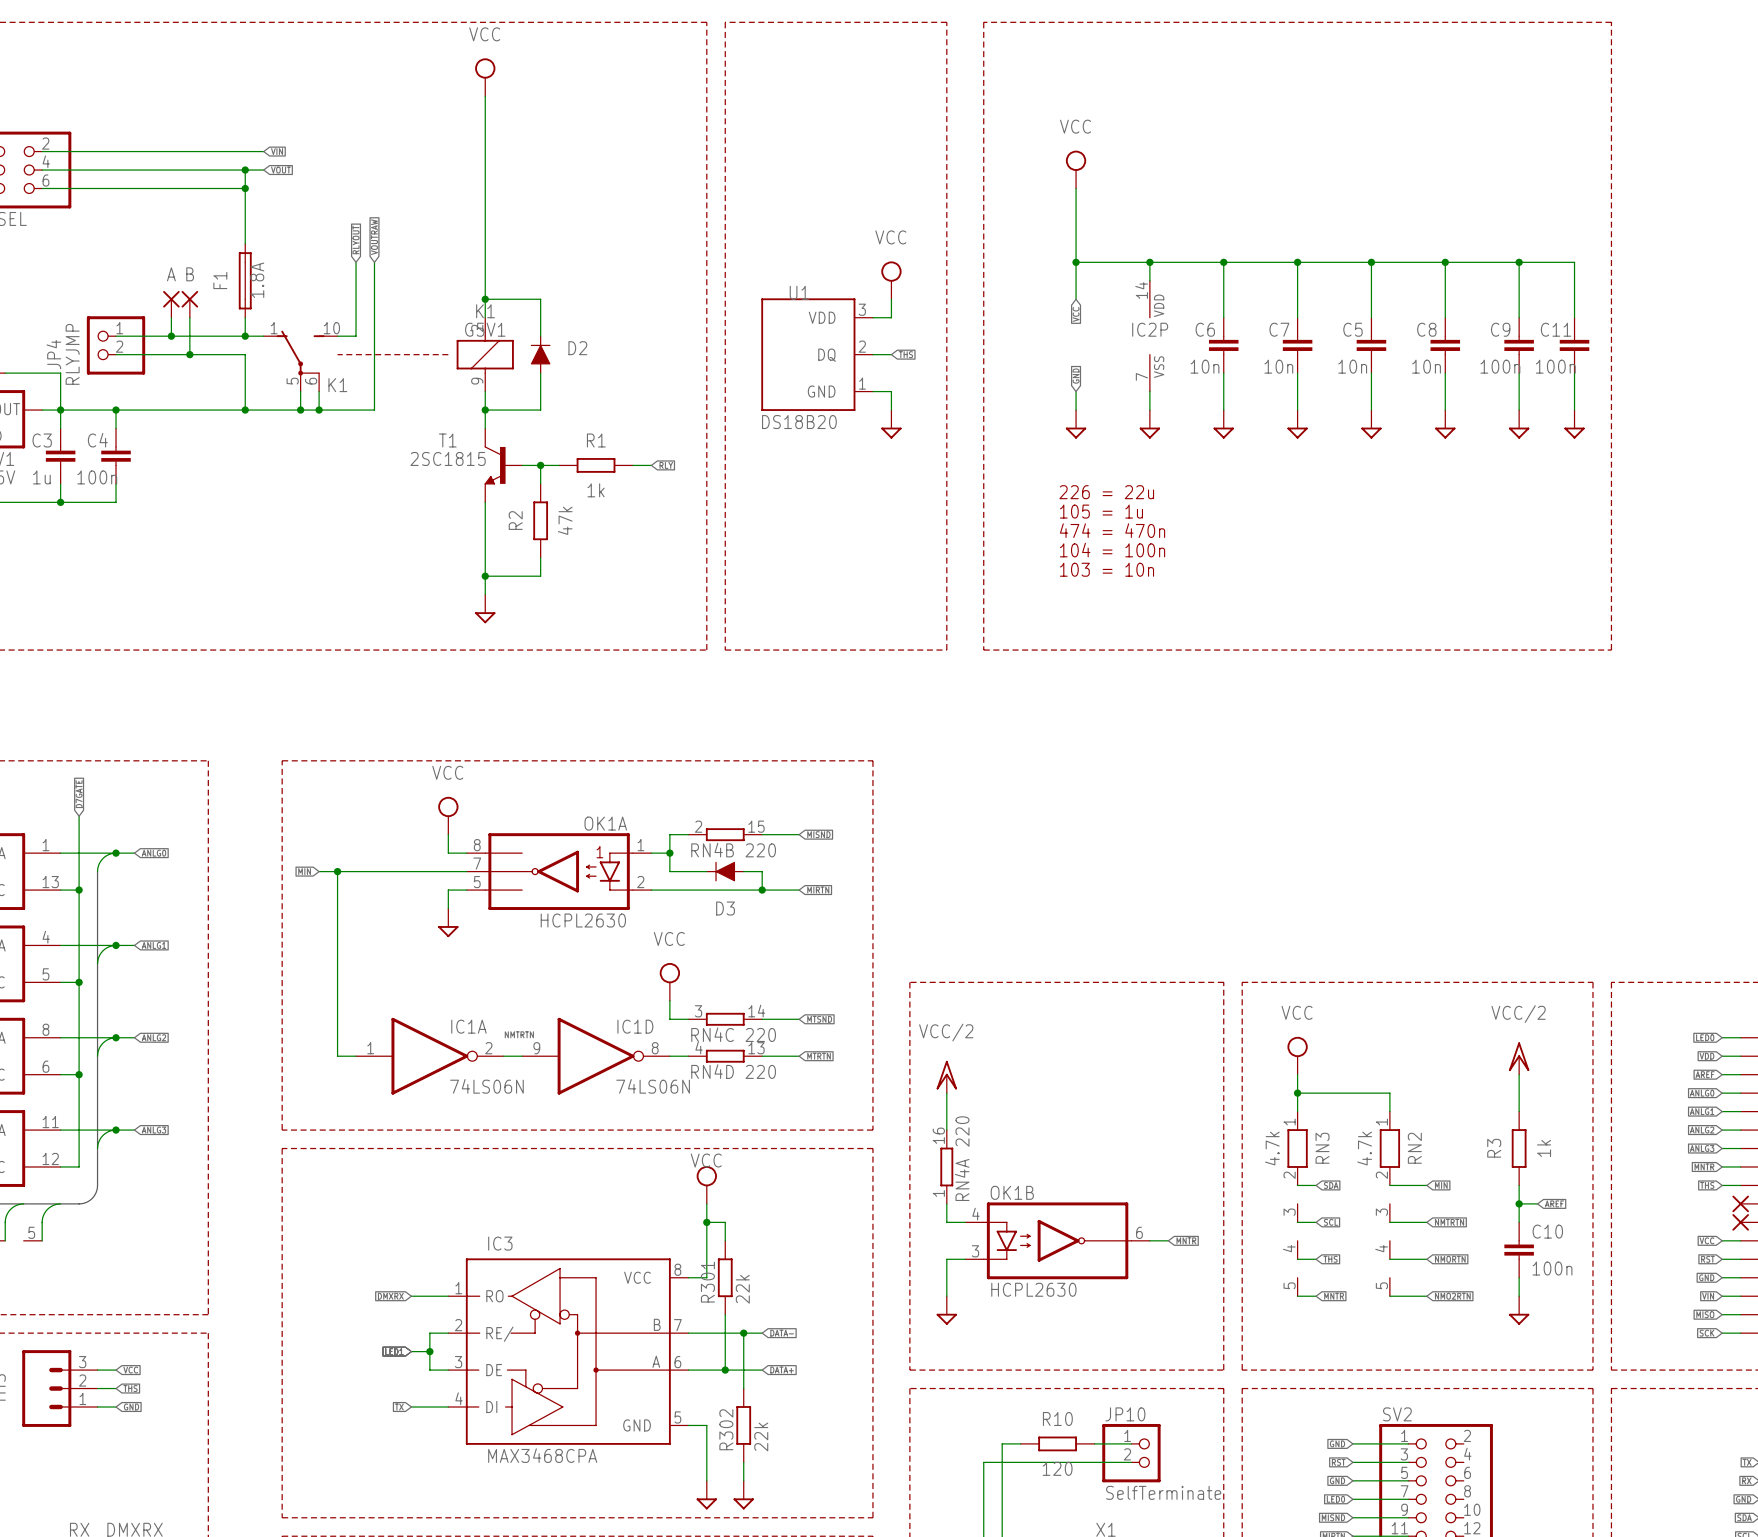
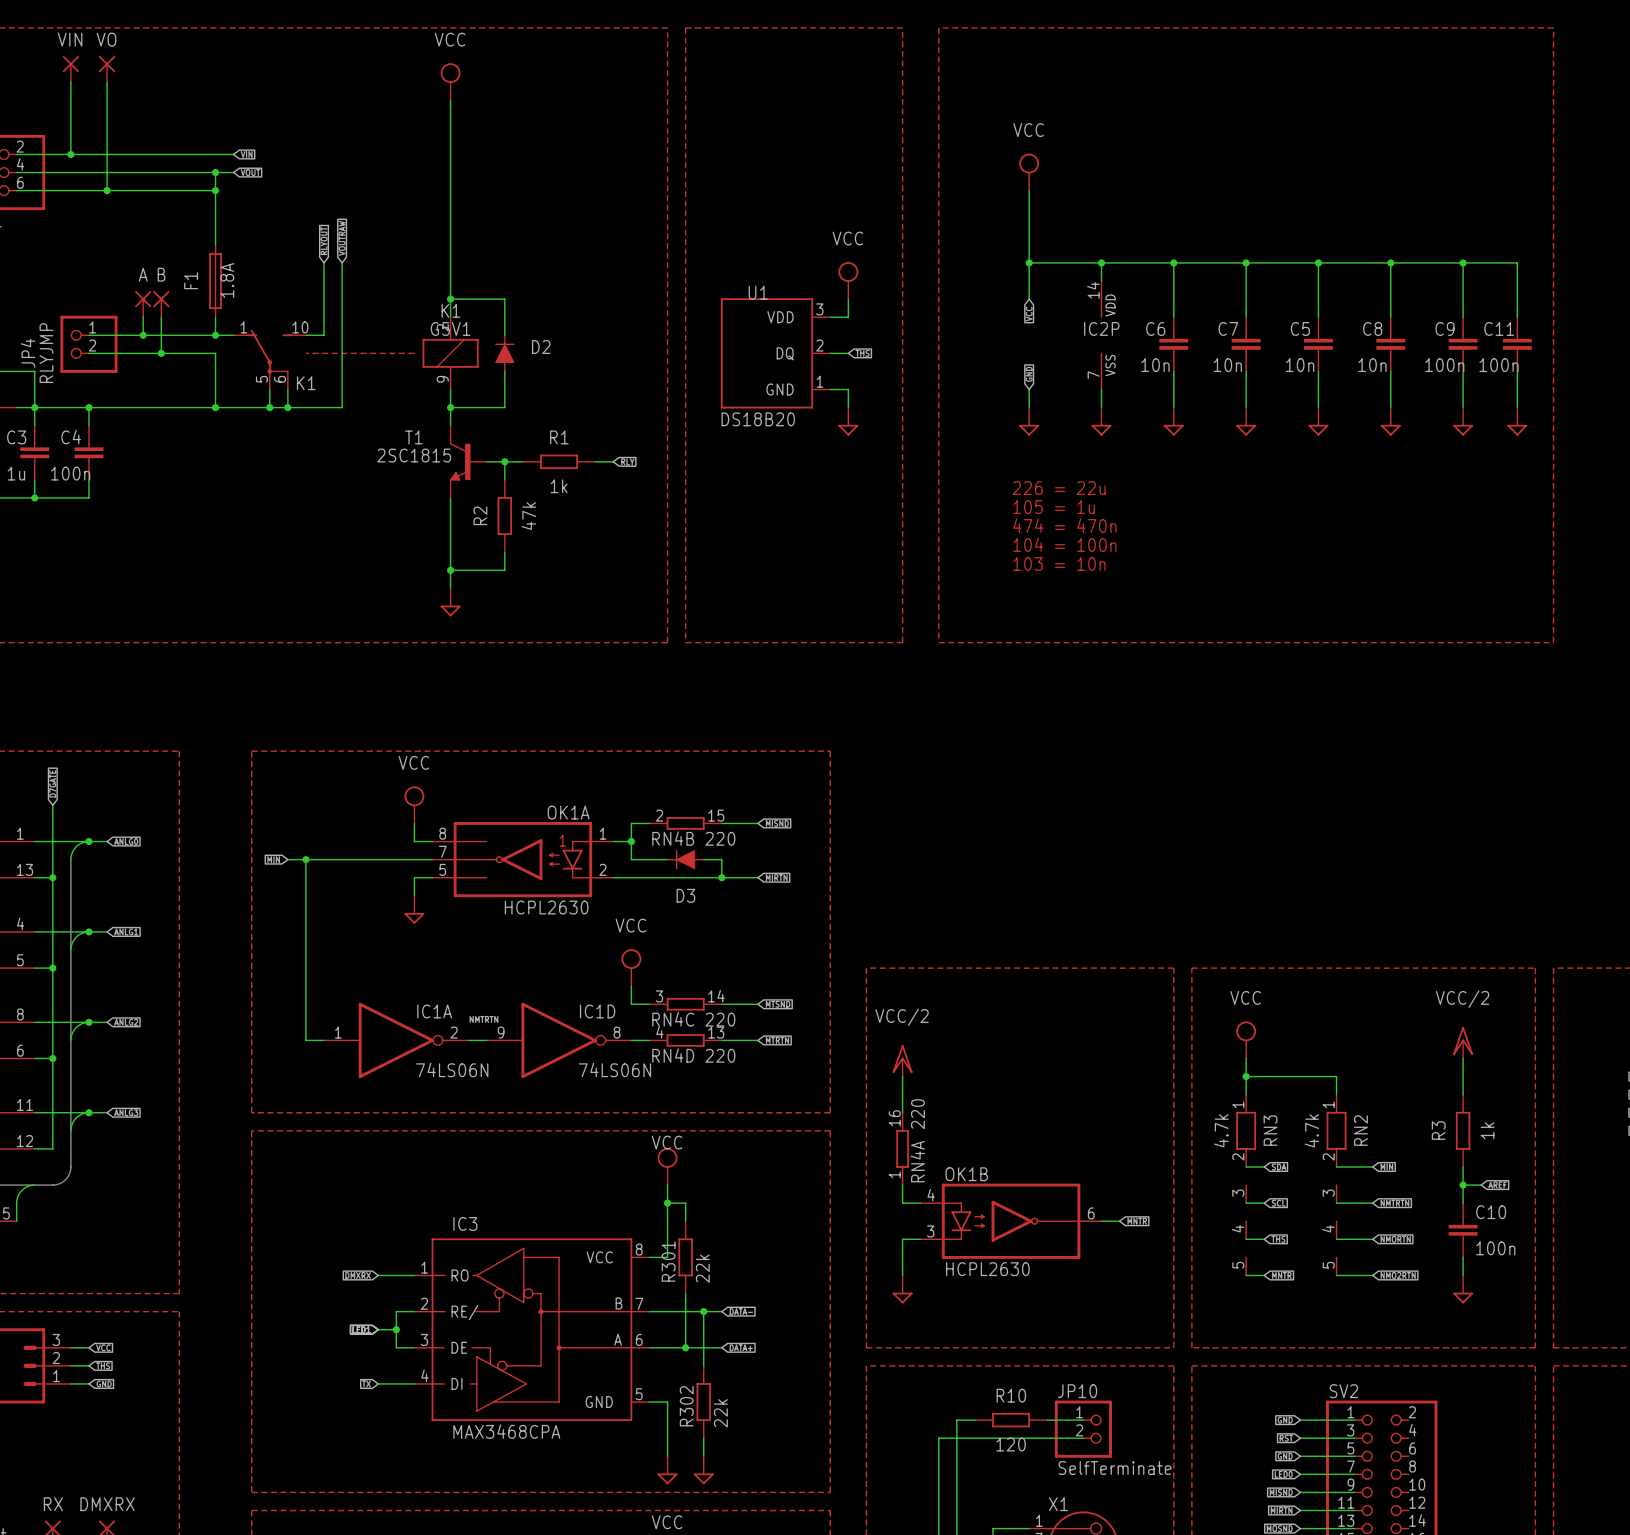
VIN: none -> (70, 69)
VO: none -> (107, 69)
wire: none -> (70, 82) (70, 154)
wire: none -> (107, 82) (107, 190)
junction: none -> (70, 154)
junction: none -> (107, 190)

